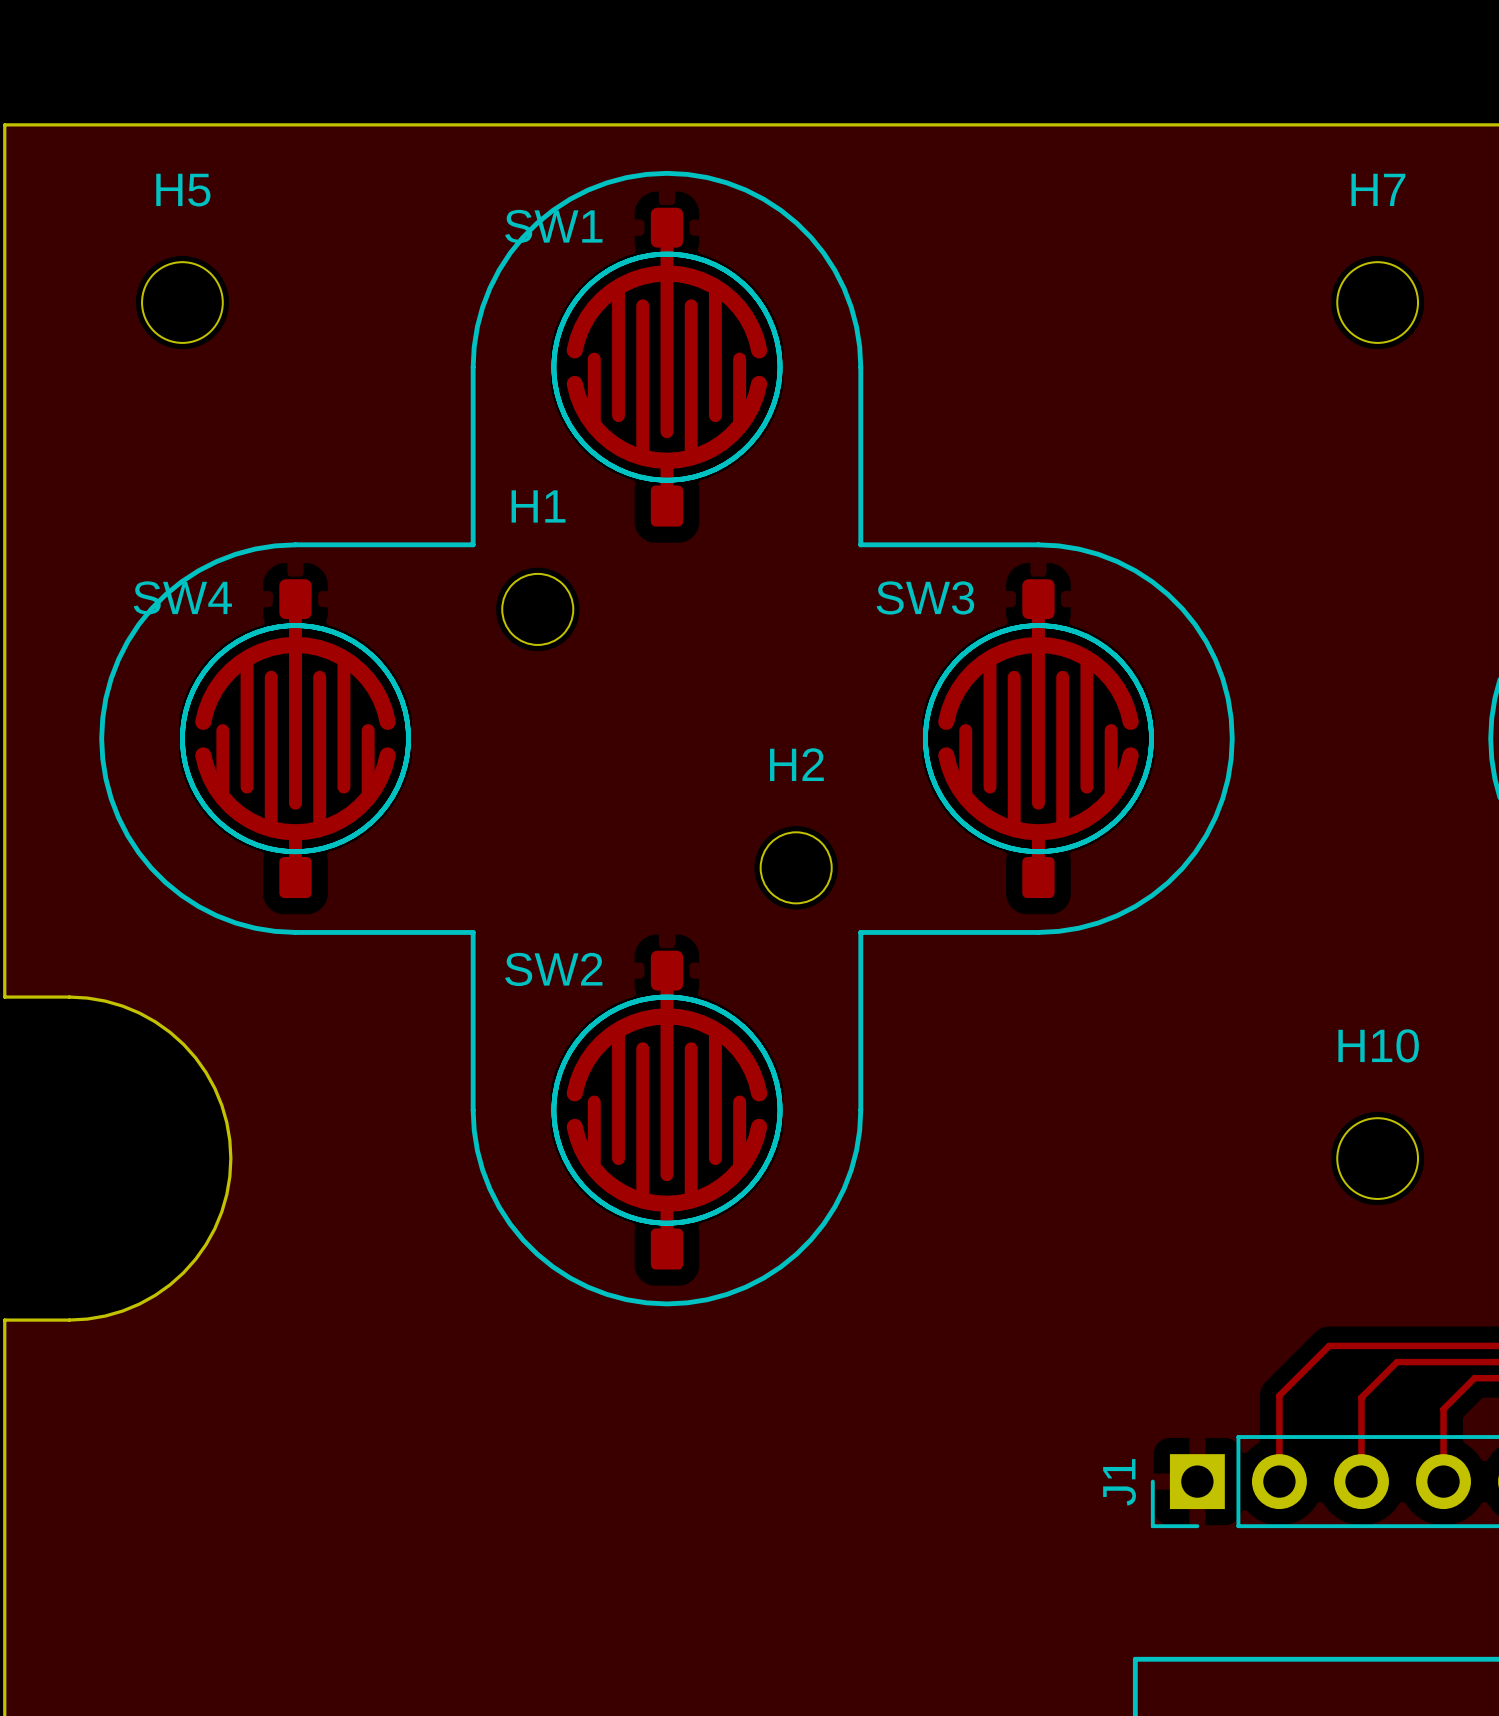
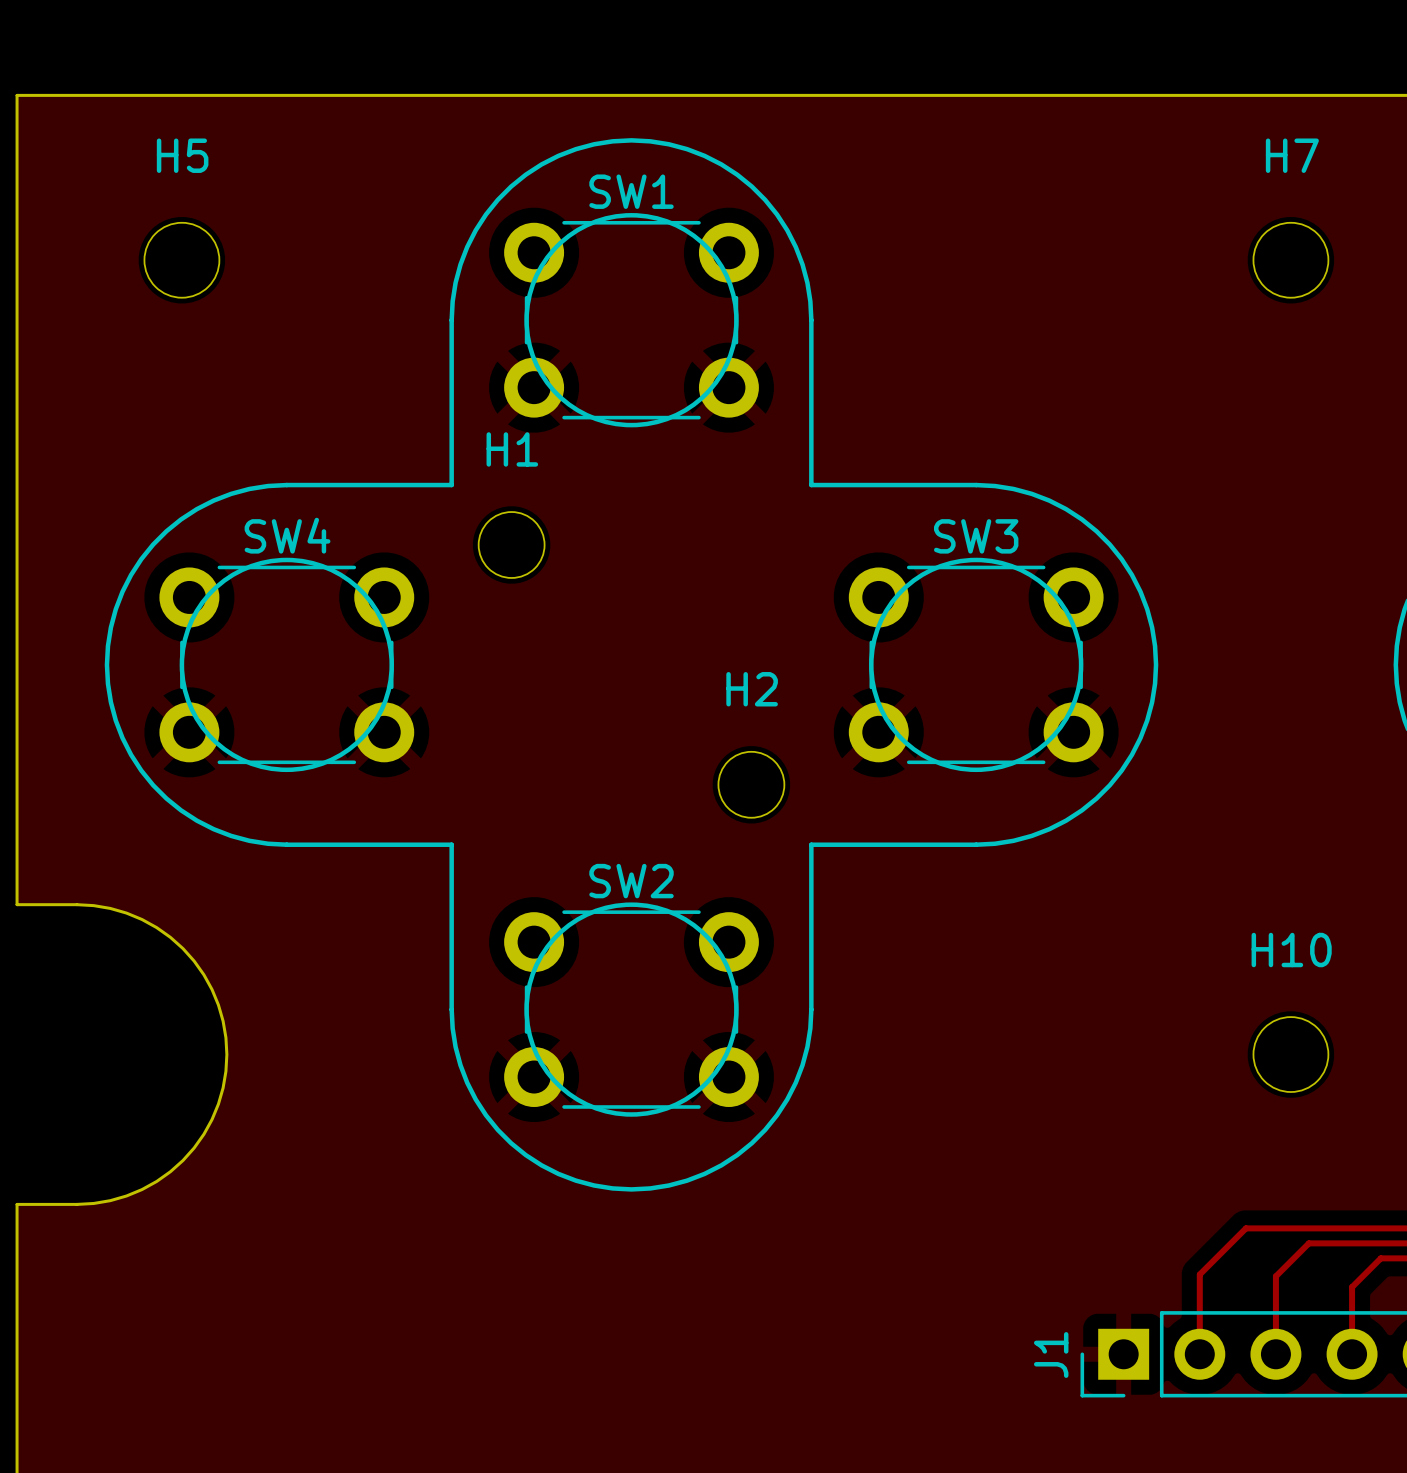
SW1 footprint: [551, 207, 783, 527] -> [504, 220, 759, 420]
SW1 name position: SW1 (553, 226) -> SW1 (631, 191)
SW4 footprint: [180, 579, 411, 899] -> [159, 565, 415, 765]
SW3 footprint: [922, 579, 1154, 899] -> [848, 565, 1104, 765]
SW4 name position: SW4 (182, 597) -> SW4 (287, 535)
SW3 name position: SW3 (925, 597) -> SW3 (976, 536)
SW2 footprint: [551, 950, 783, 1270] -> [504, 910, 759, 1109]
SW2 name position: SW2 (553, 969) -> SW2 (631, 881)

